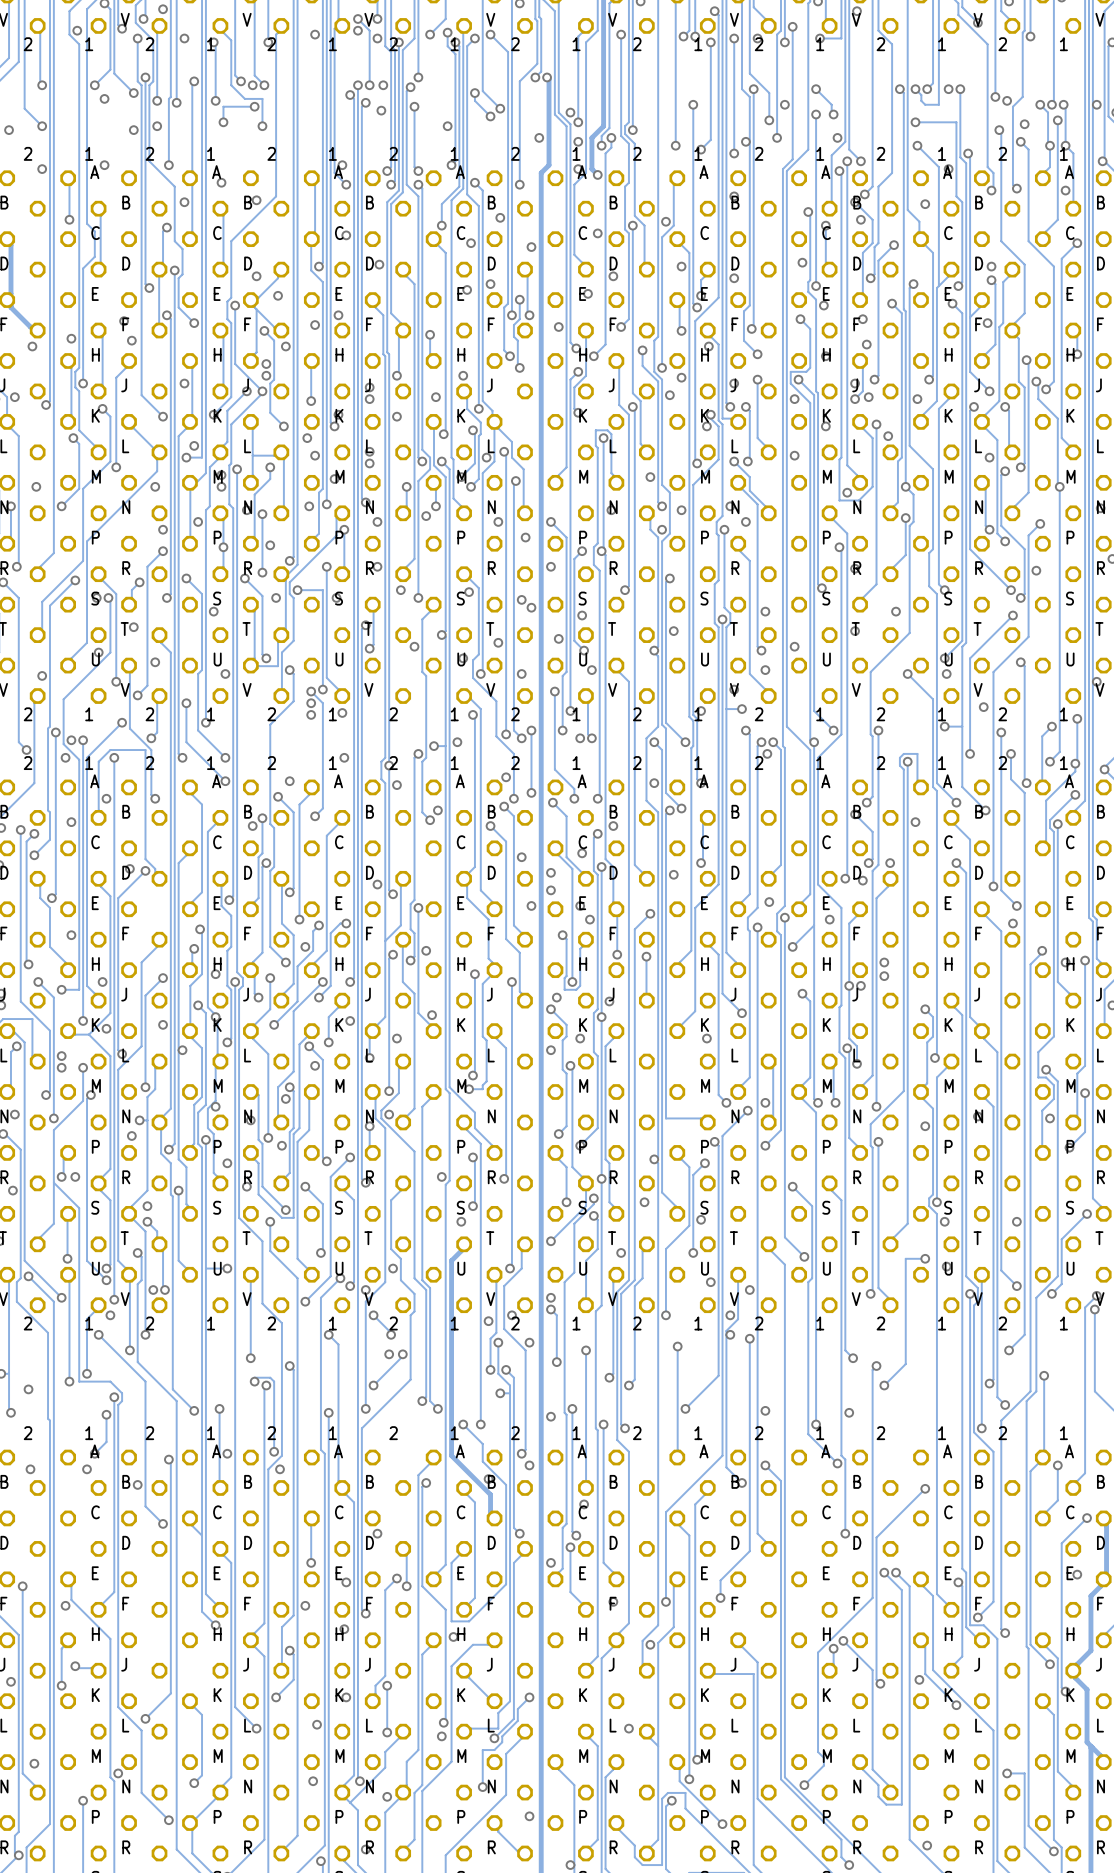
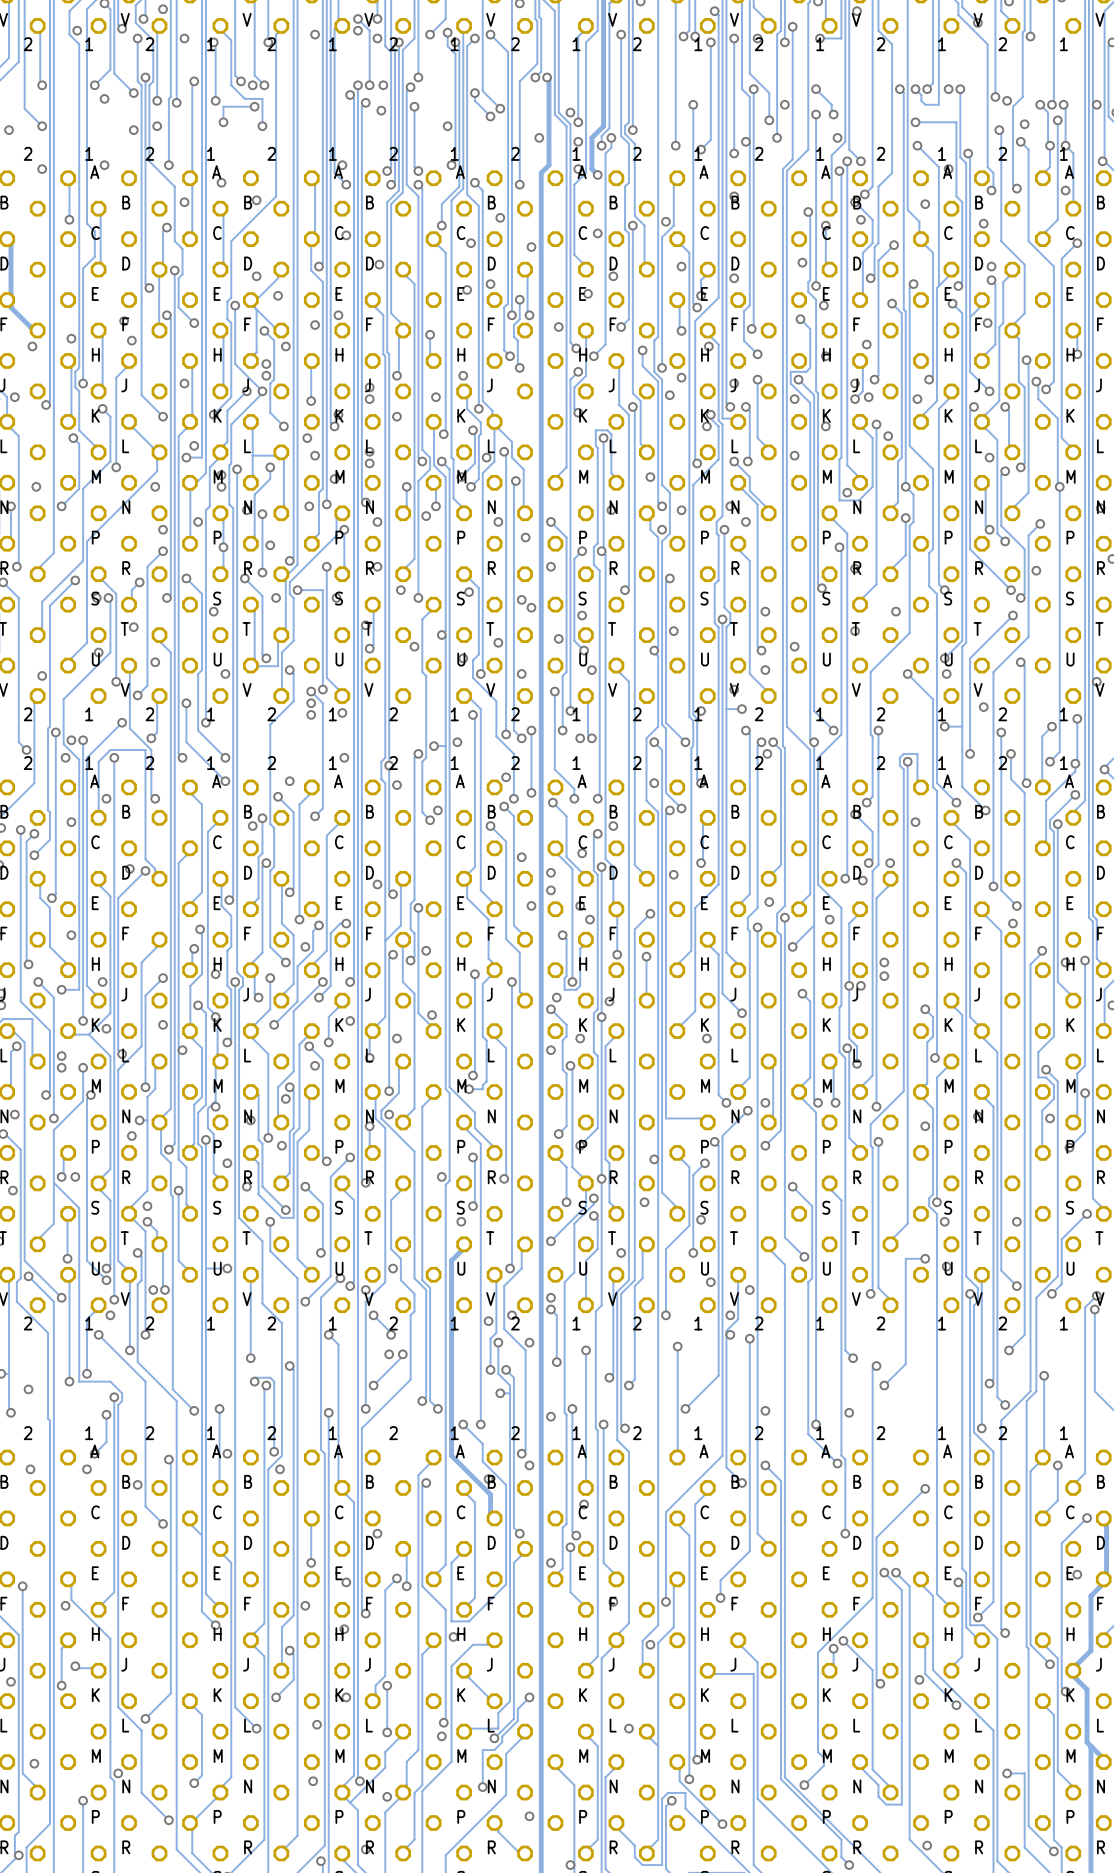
via: none -> (983, 223)
via: (862, 319) -> none

